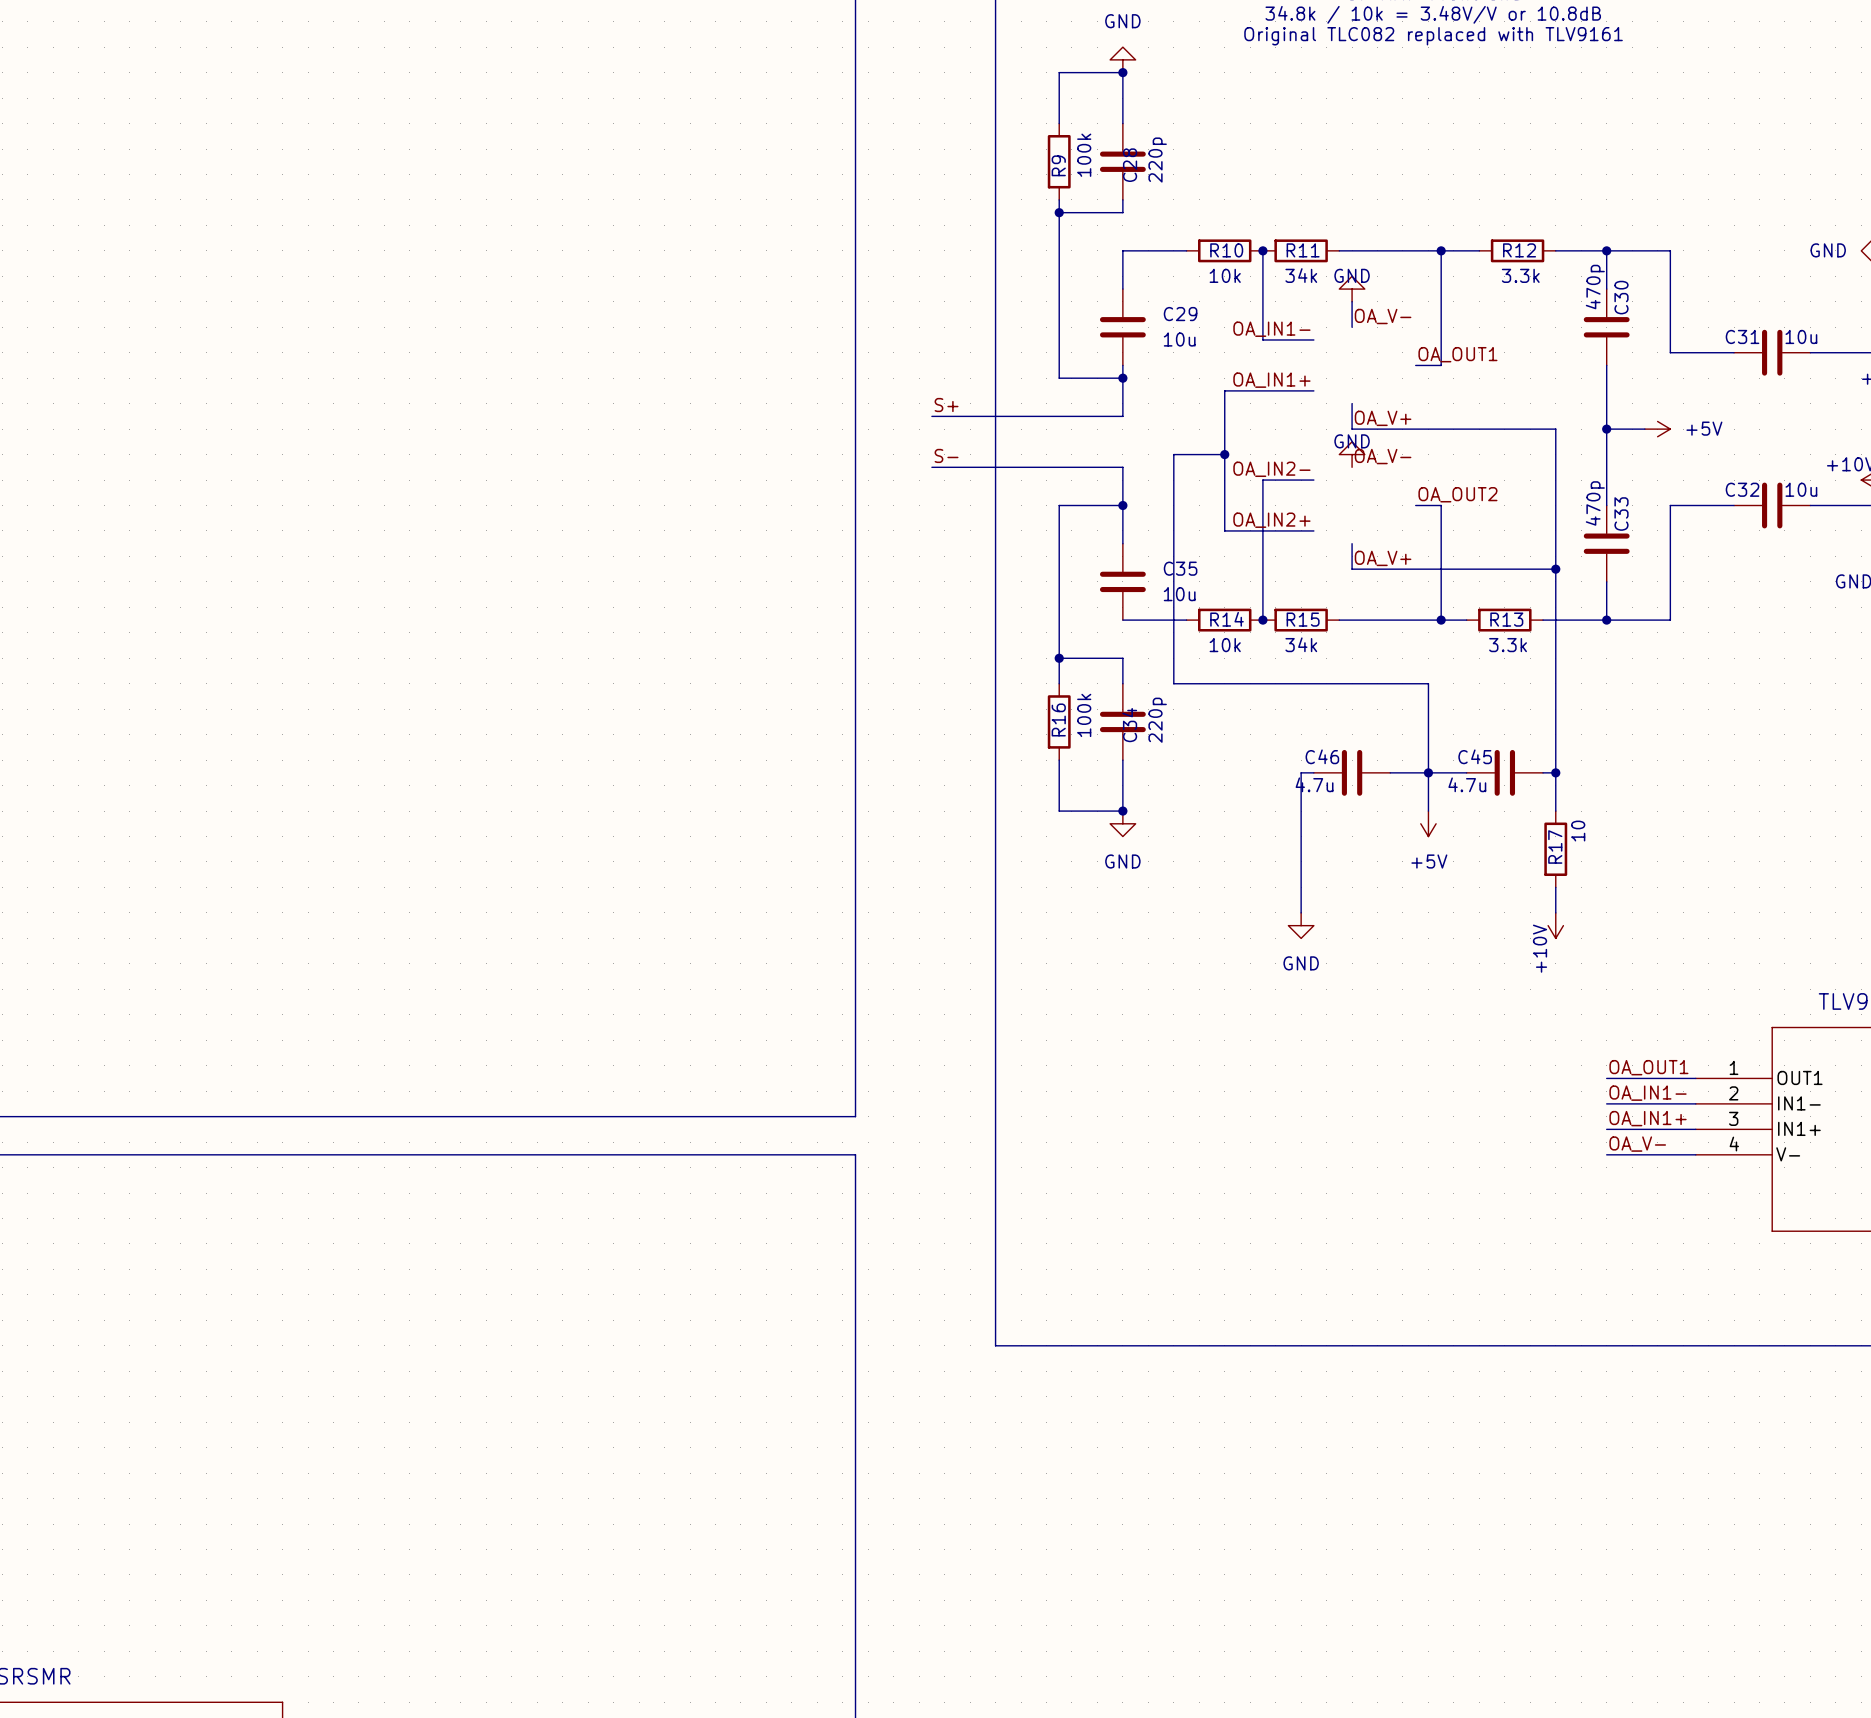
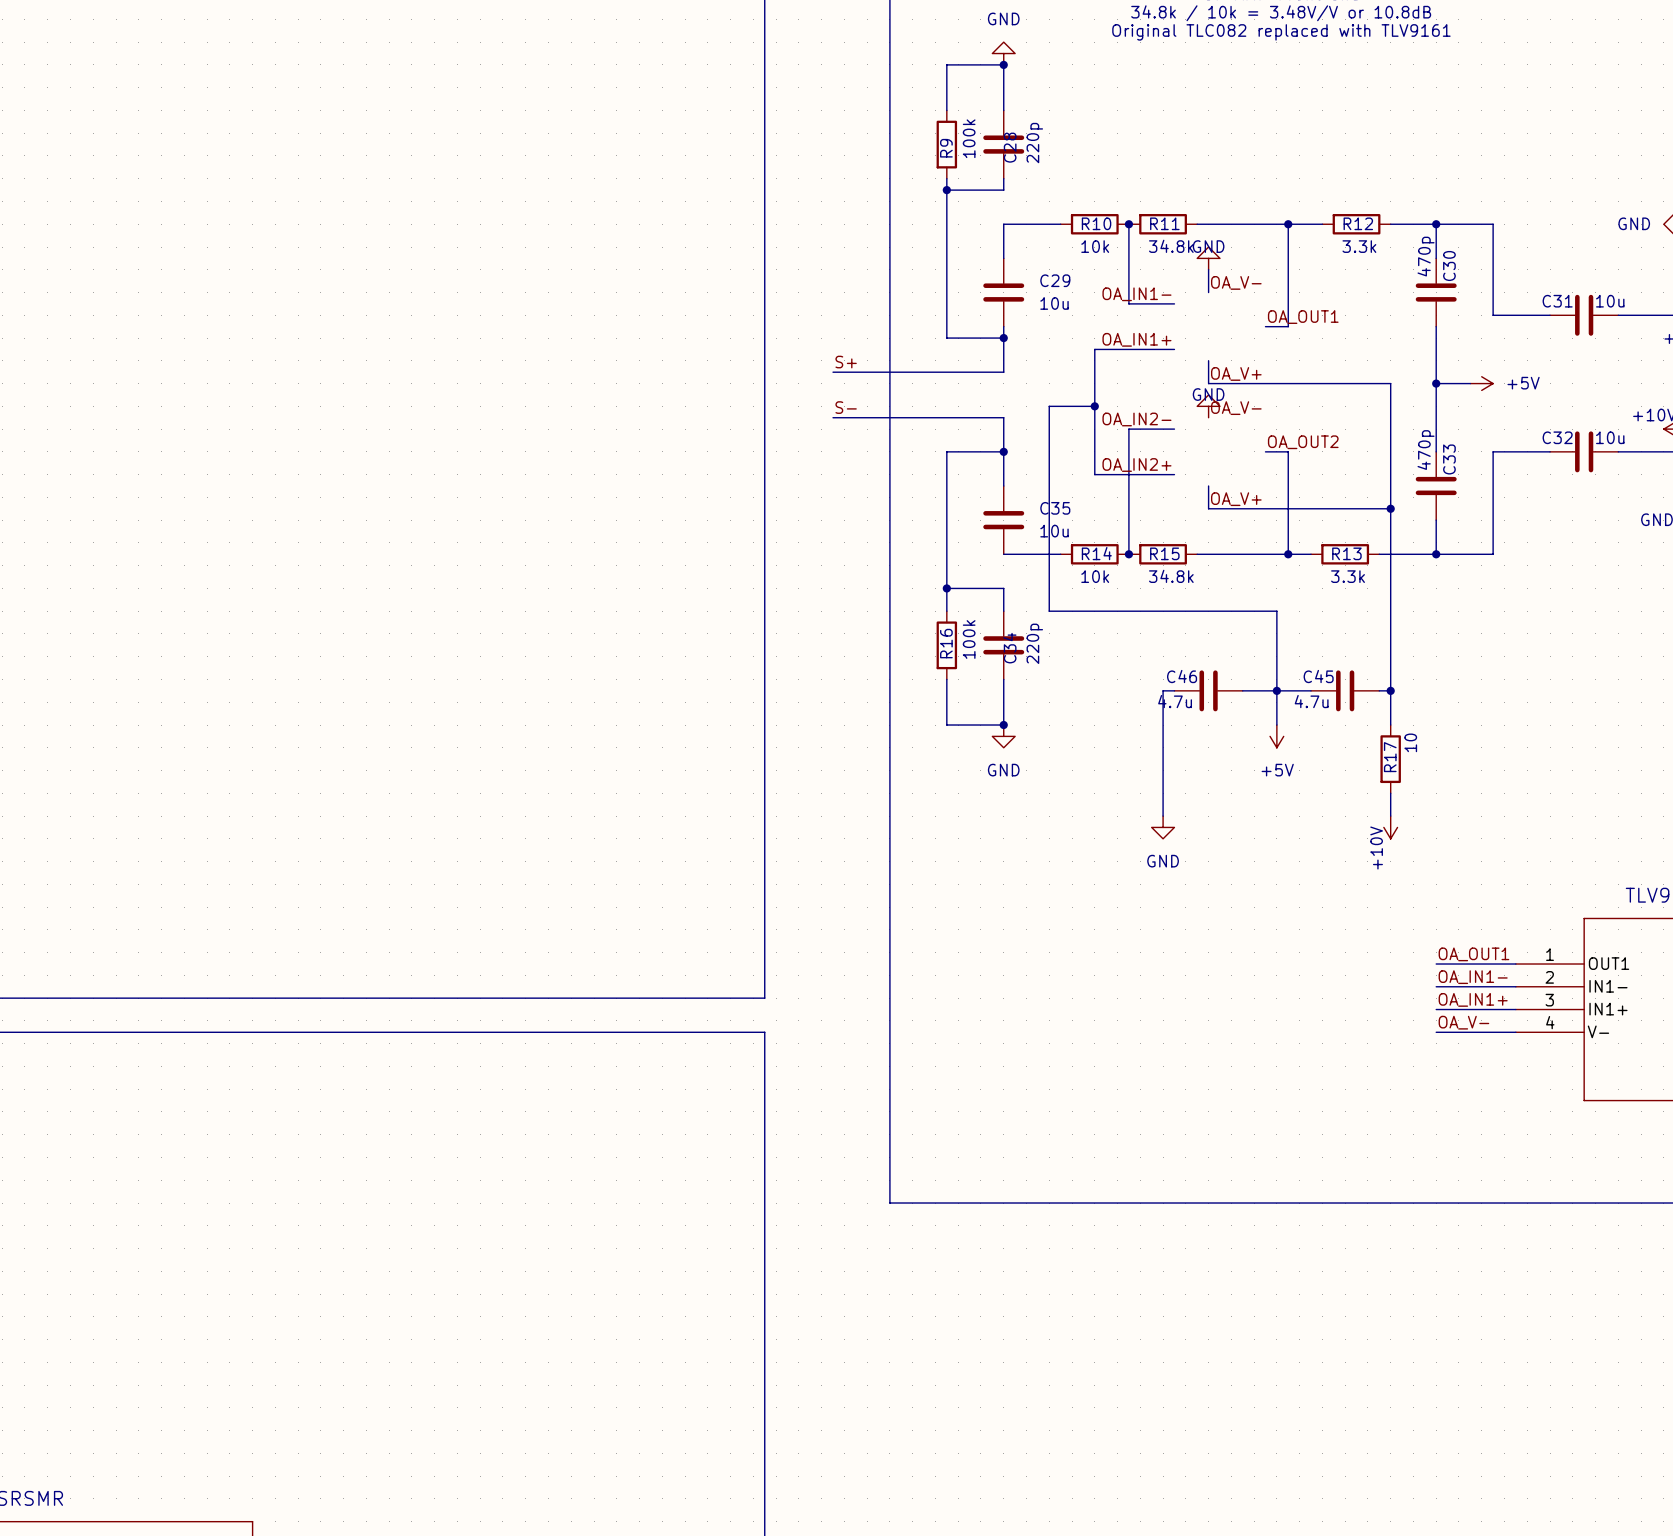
R11 value: 34k (1301, 275) -> 34.8k (1171, 246)
R15 value: 34k (1301, 644) -> 34.8k (1171, 576)

